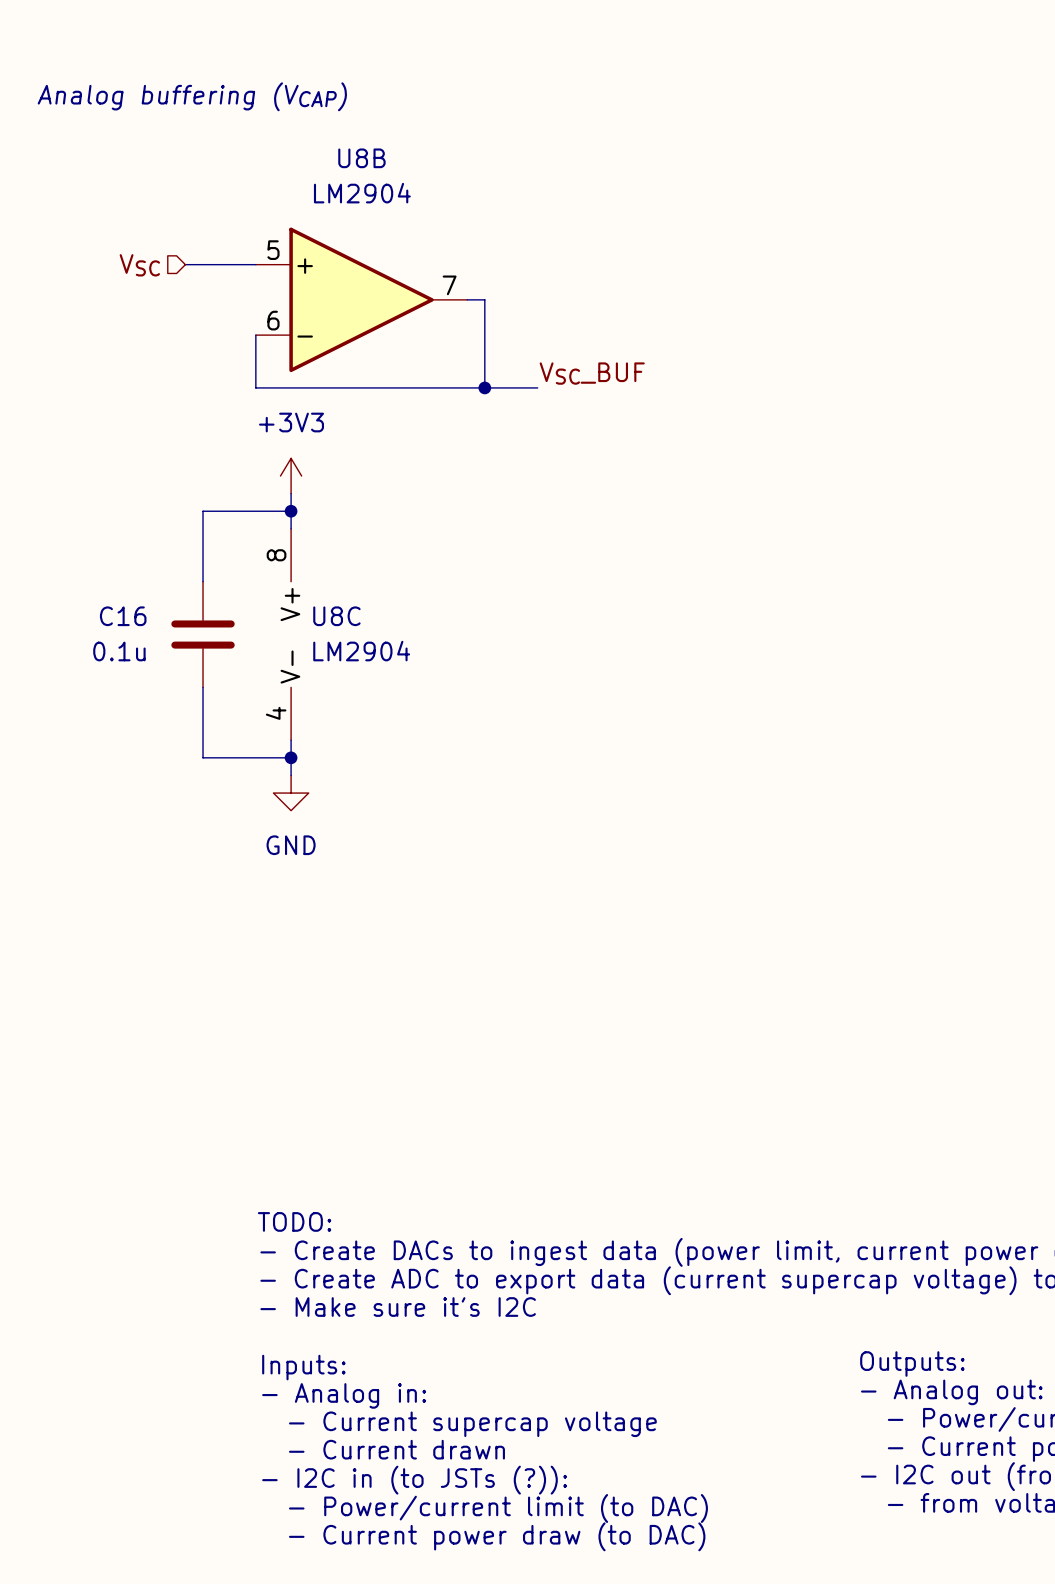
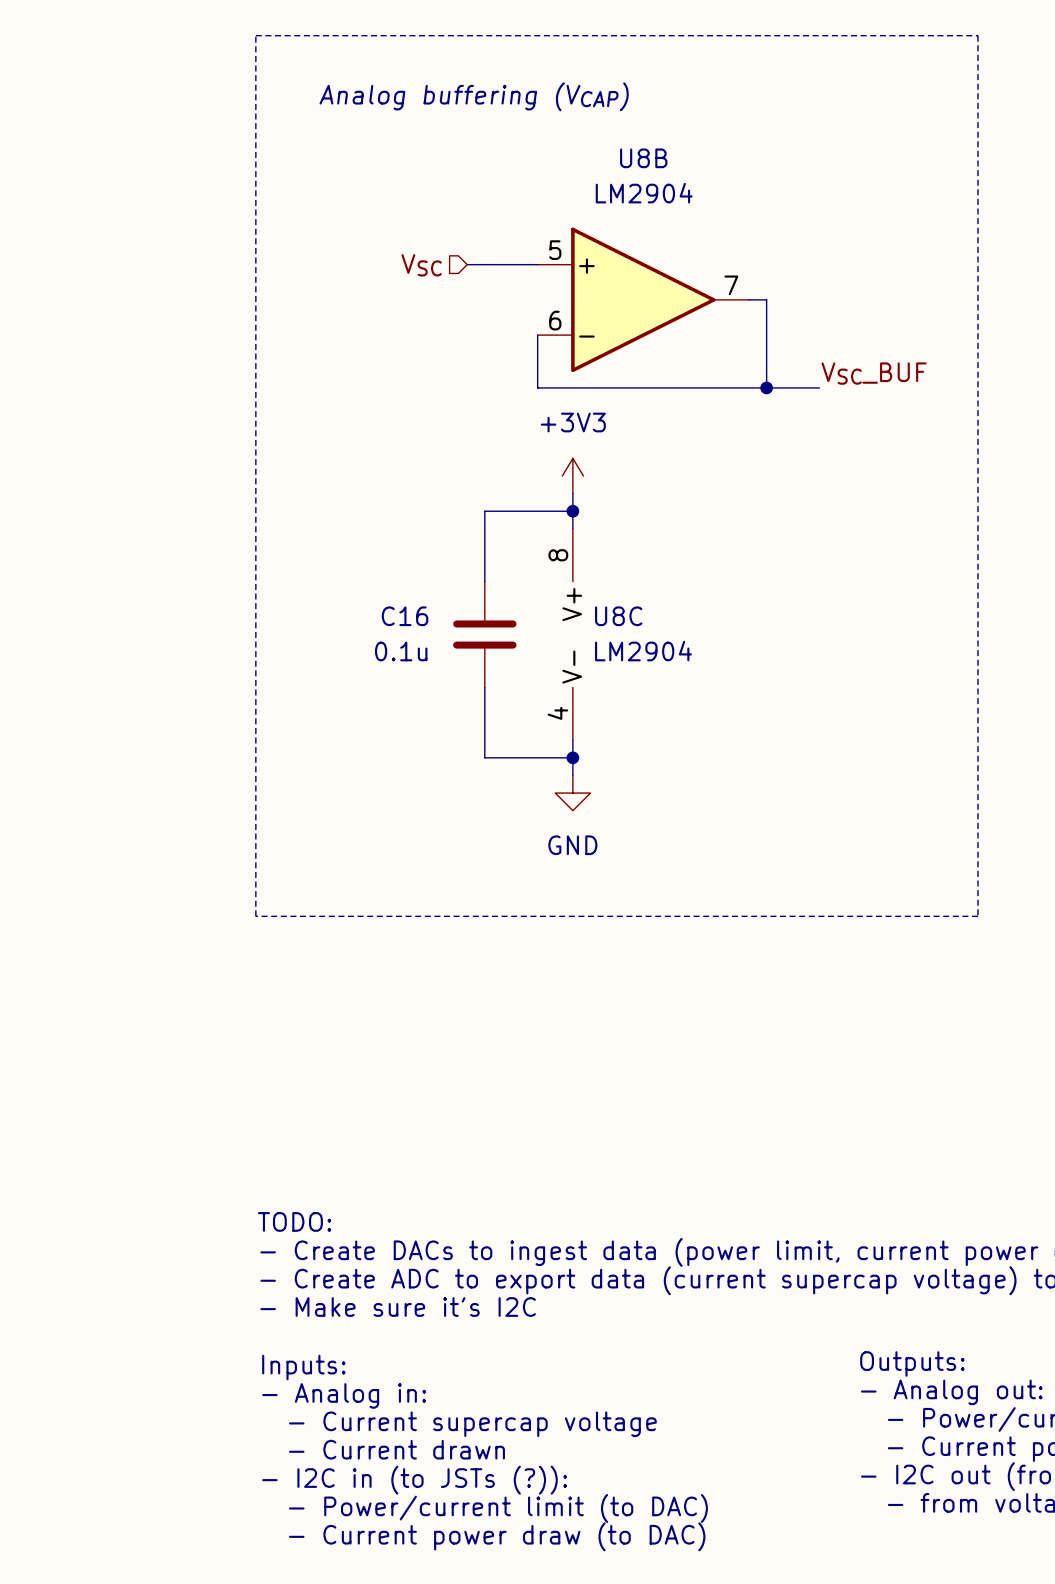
line: none -> (255, 35) (977, 35) (977, 916) (255, 916) (255, 35)
text position: Analog buffering (VCAP) (192, 96) -> Analog buffering (VCAP) (474, 96)
wire: (185, 264) (255, 264) -> (467, 264) (537, 264)
hierarchical label position: VSC (139, 265) -> VSC (421, 265)
U8B position: (361, 299) -> (643, 299)
wire: (467, 299) (484, 299) (484, 387) -> (749, 299) (766, 299) (766, 387)
wire: (255, 335) (255, 387) (537, 387) -> (537, 335) (537, 387) (819, 387)
label position: VSC_BUF (592, 373) -> VSC_BUF (874, 373)
junction: (484, 387) -> none
junction: none -> (766, 387)
power symbol position: +3V3 (291, 476) -> +3V3 (572, 476)
wire: (291, 493) (291, 528) -> (572, 493) (572, 528)
wire: (291, 511) (203, 511) (203, 581) -> (572, 511) (484, 511) (484, 581)
junction: (291, 511) -> none
junction: none -> (572, 511)
C16 position: (203, 634) -> (484, 634)
U8C position: (291, 634) -> (572, 634)
wire: (203, 687) (203, 757) (291, 757) -> (484, 687) (484, 757) (572, 757)
wire: (291, 740) (291, 775) -> (572, 740) (572, 775)
junction: (291, 757) -> none
junction: none -> (572, 757)
power symbol position: GND (291, 793) -> GND (572, 793)

